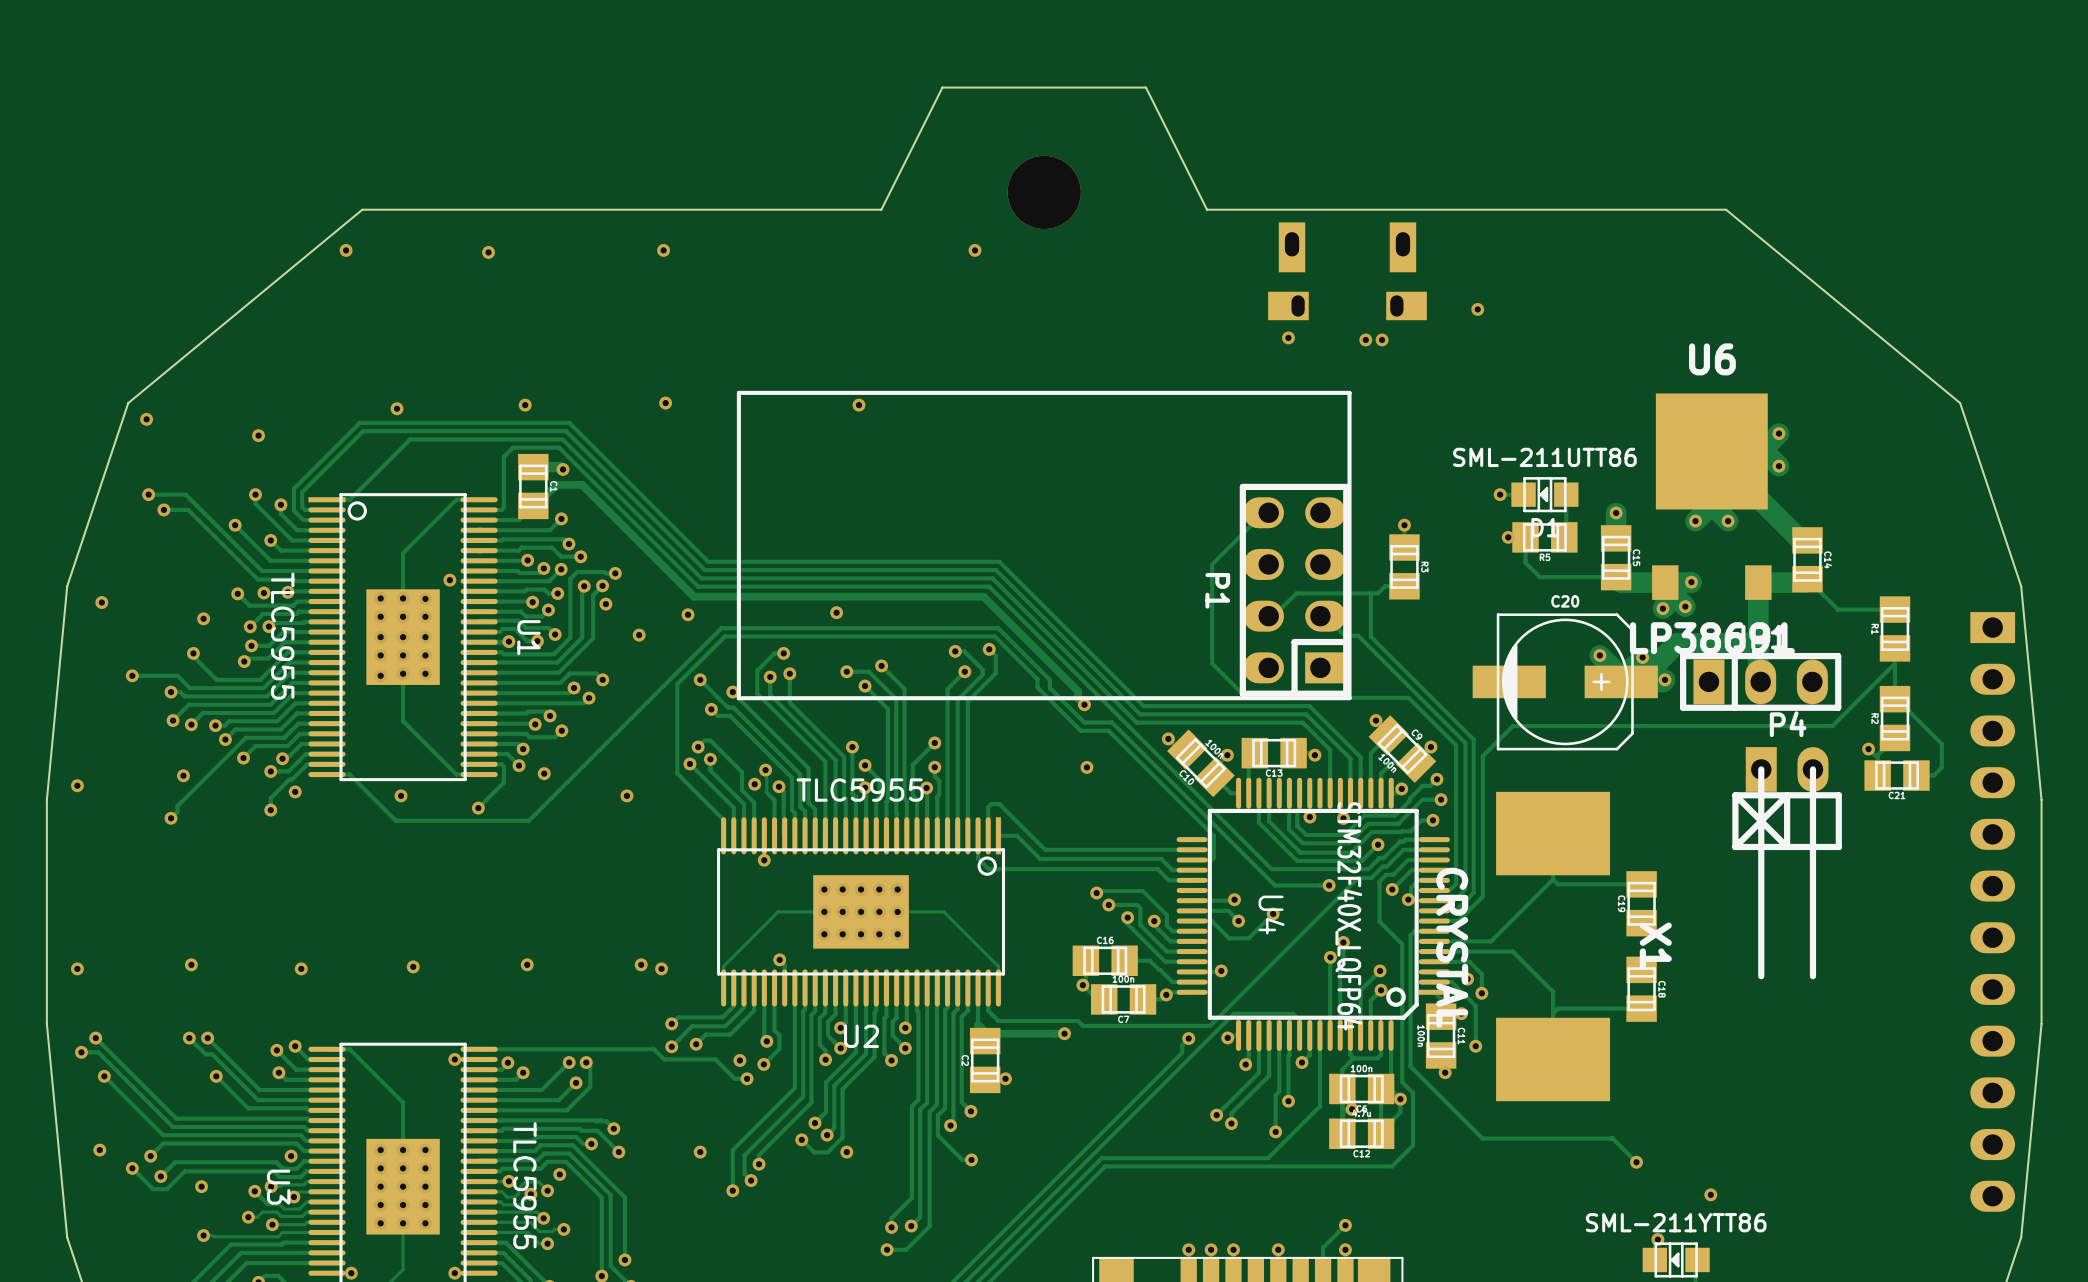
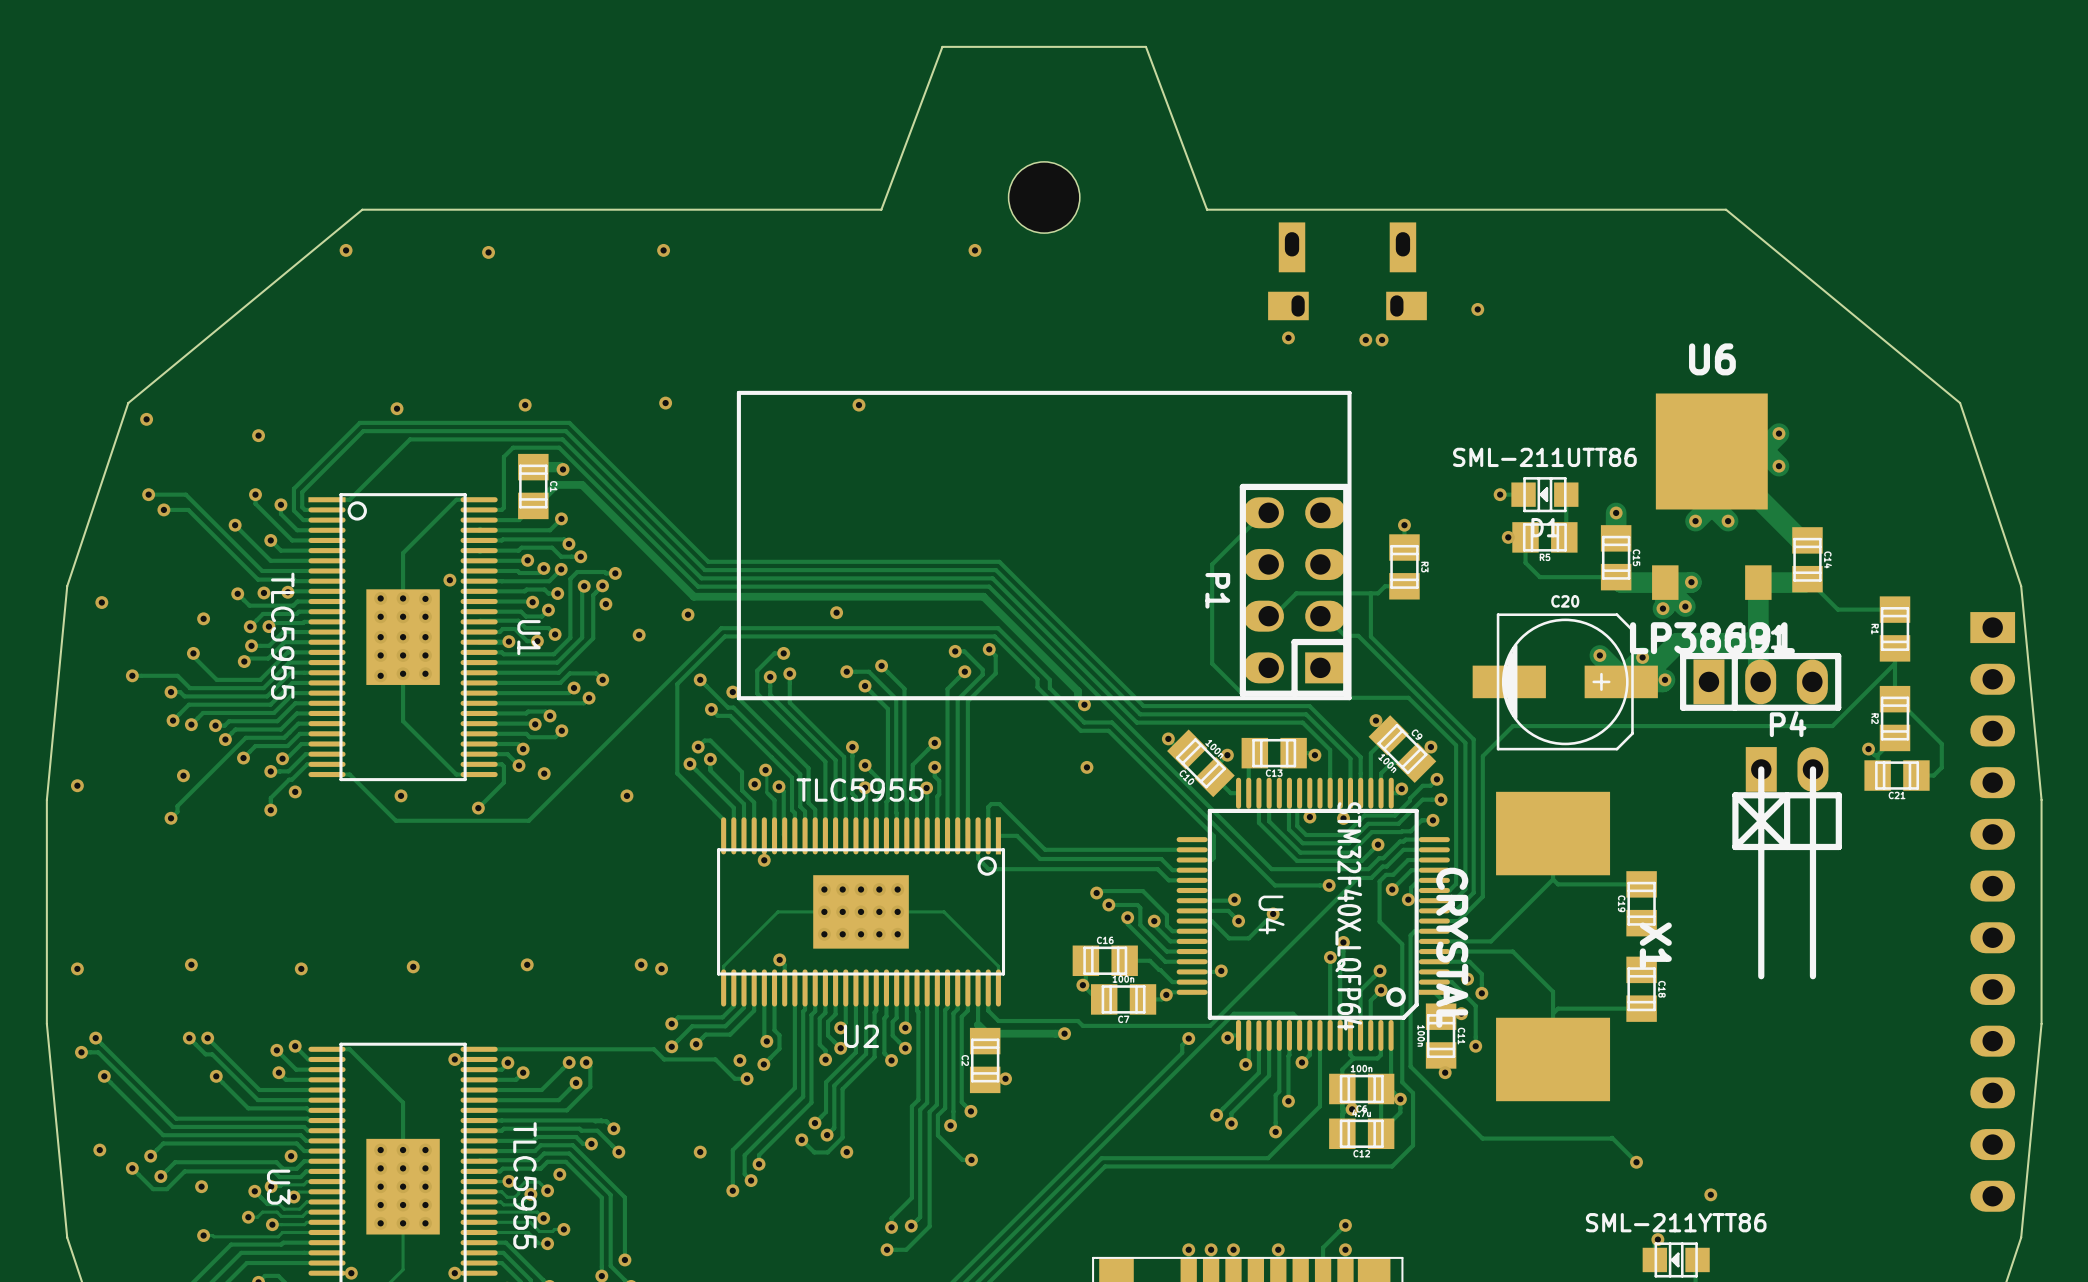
part footprint: [1007, 155, 1081, 230] -> [1008, 161, 1080, 234]
board edge: (1207, 209) (1145, 87) (942, 87) (881, 209) -> (1207, 209) (1145, 46) (942, 46) (881, 209)

